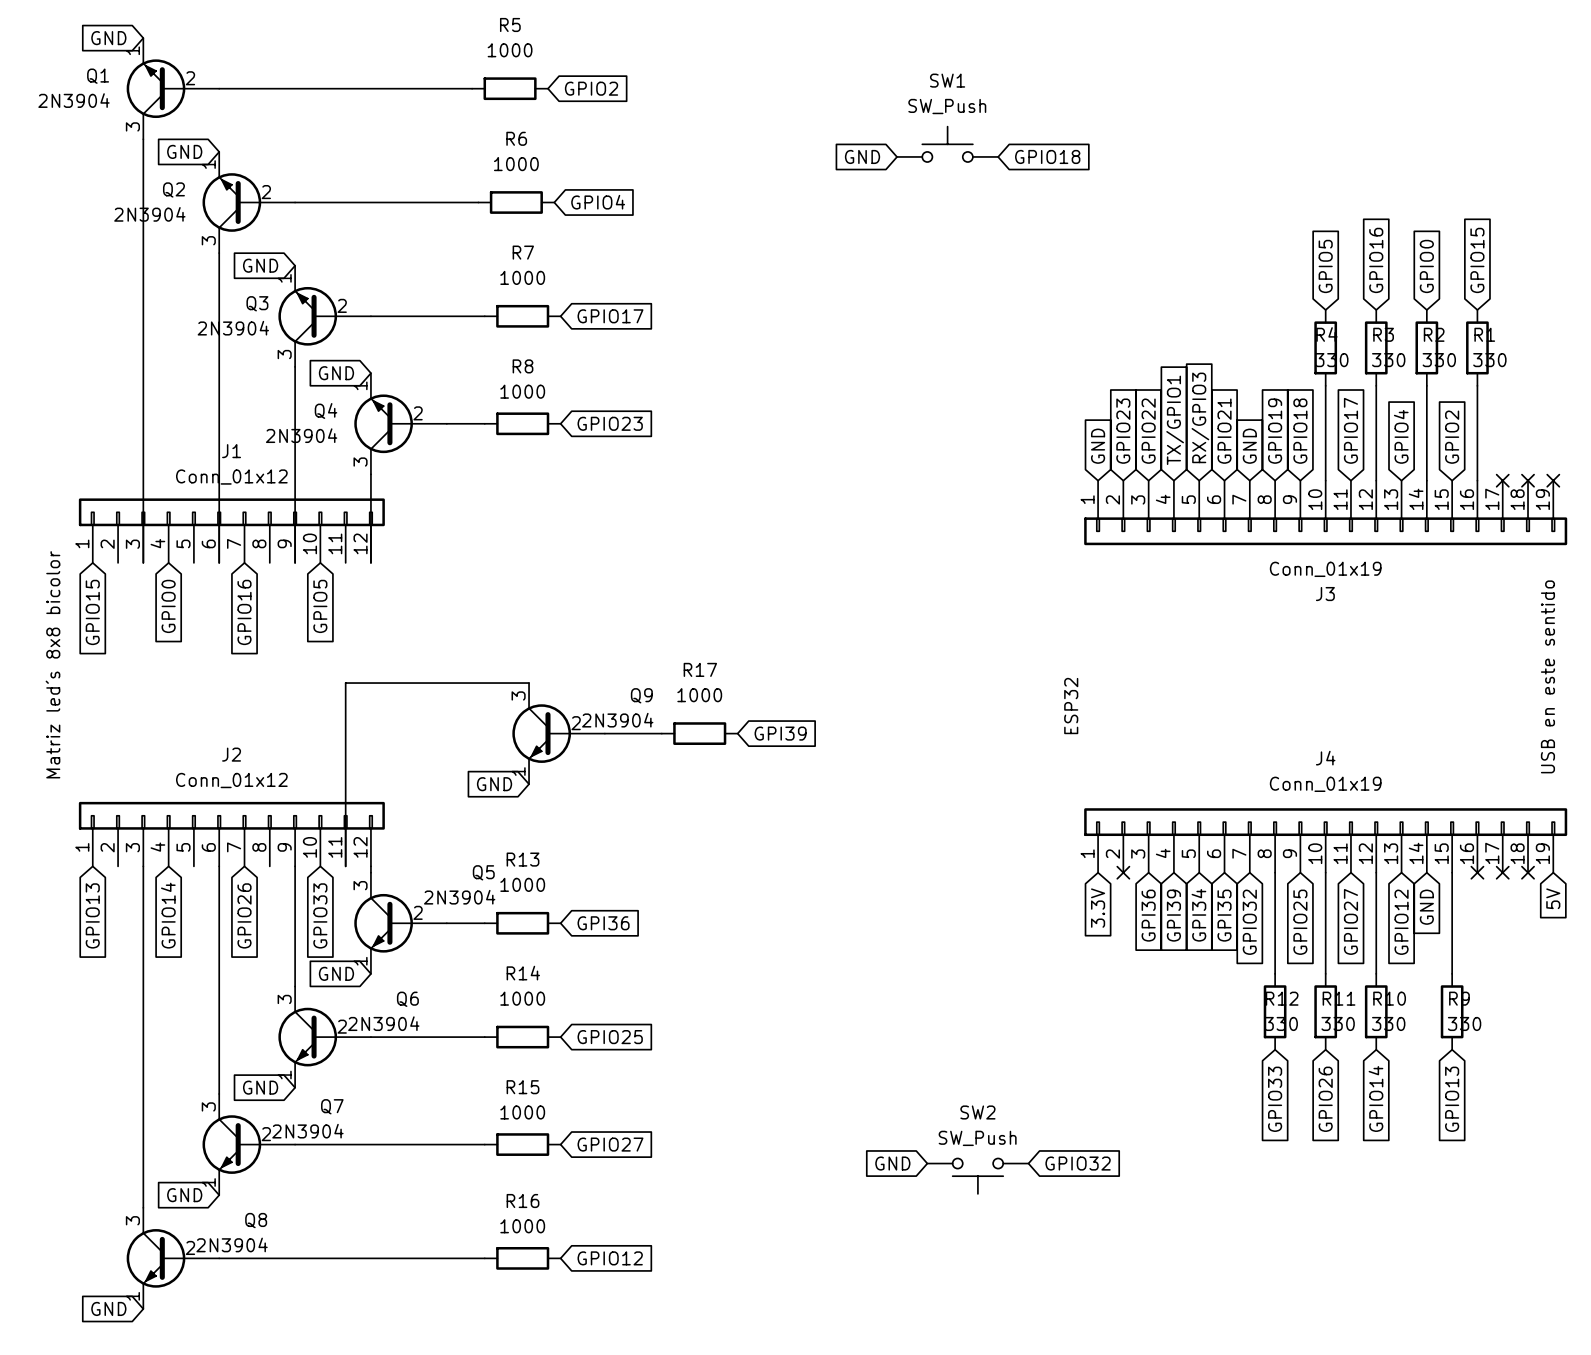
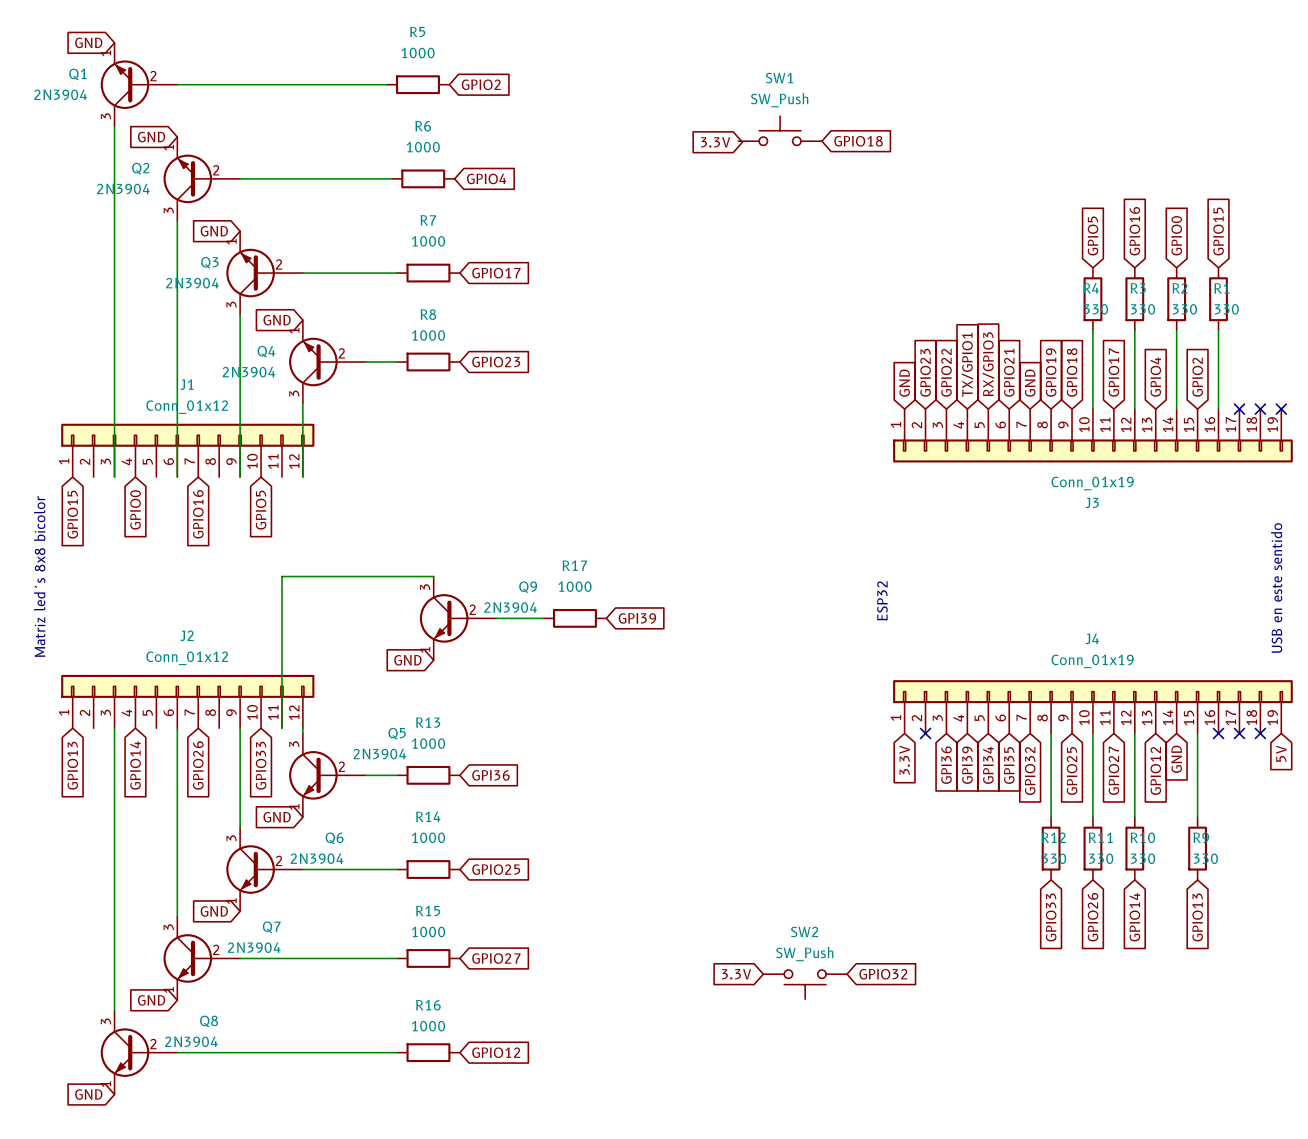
global label: GND (862, 156) -> 3.3V (715, 142)
global label: GND (892, 1163) -> 3.3V (736, 974)

